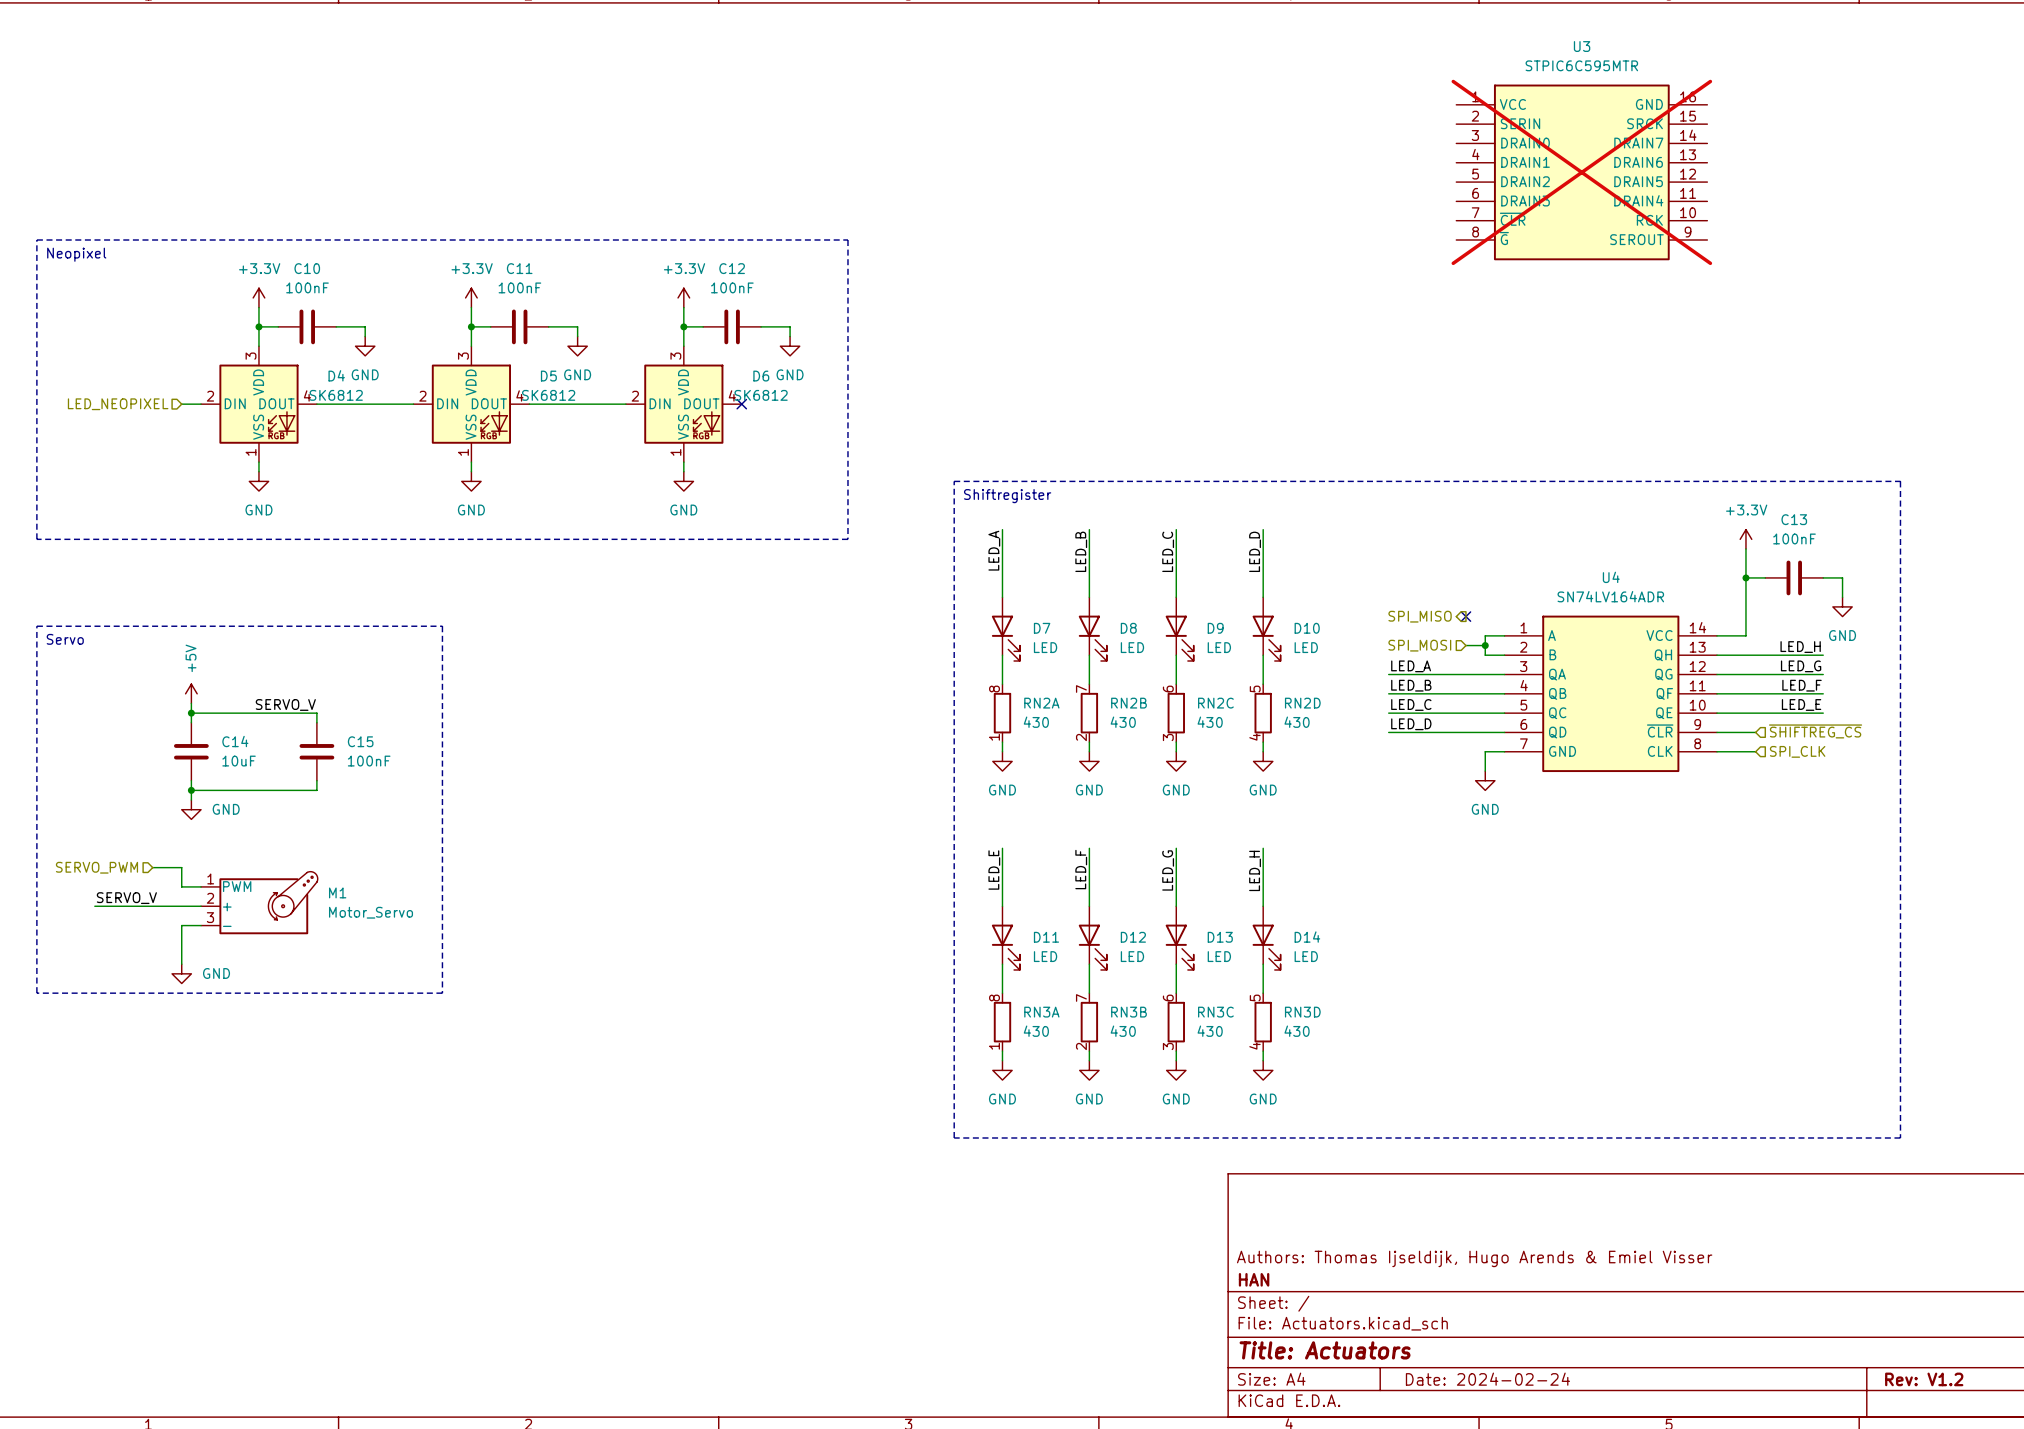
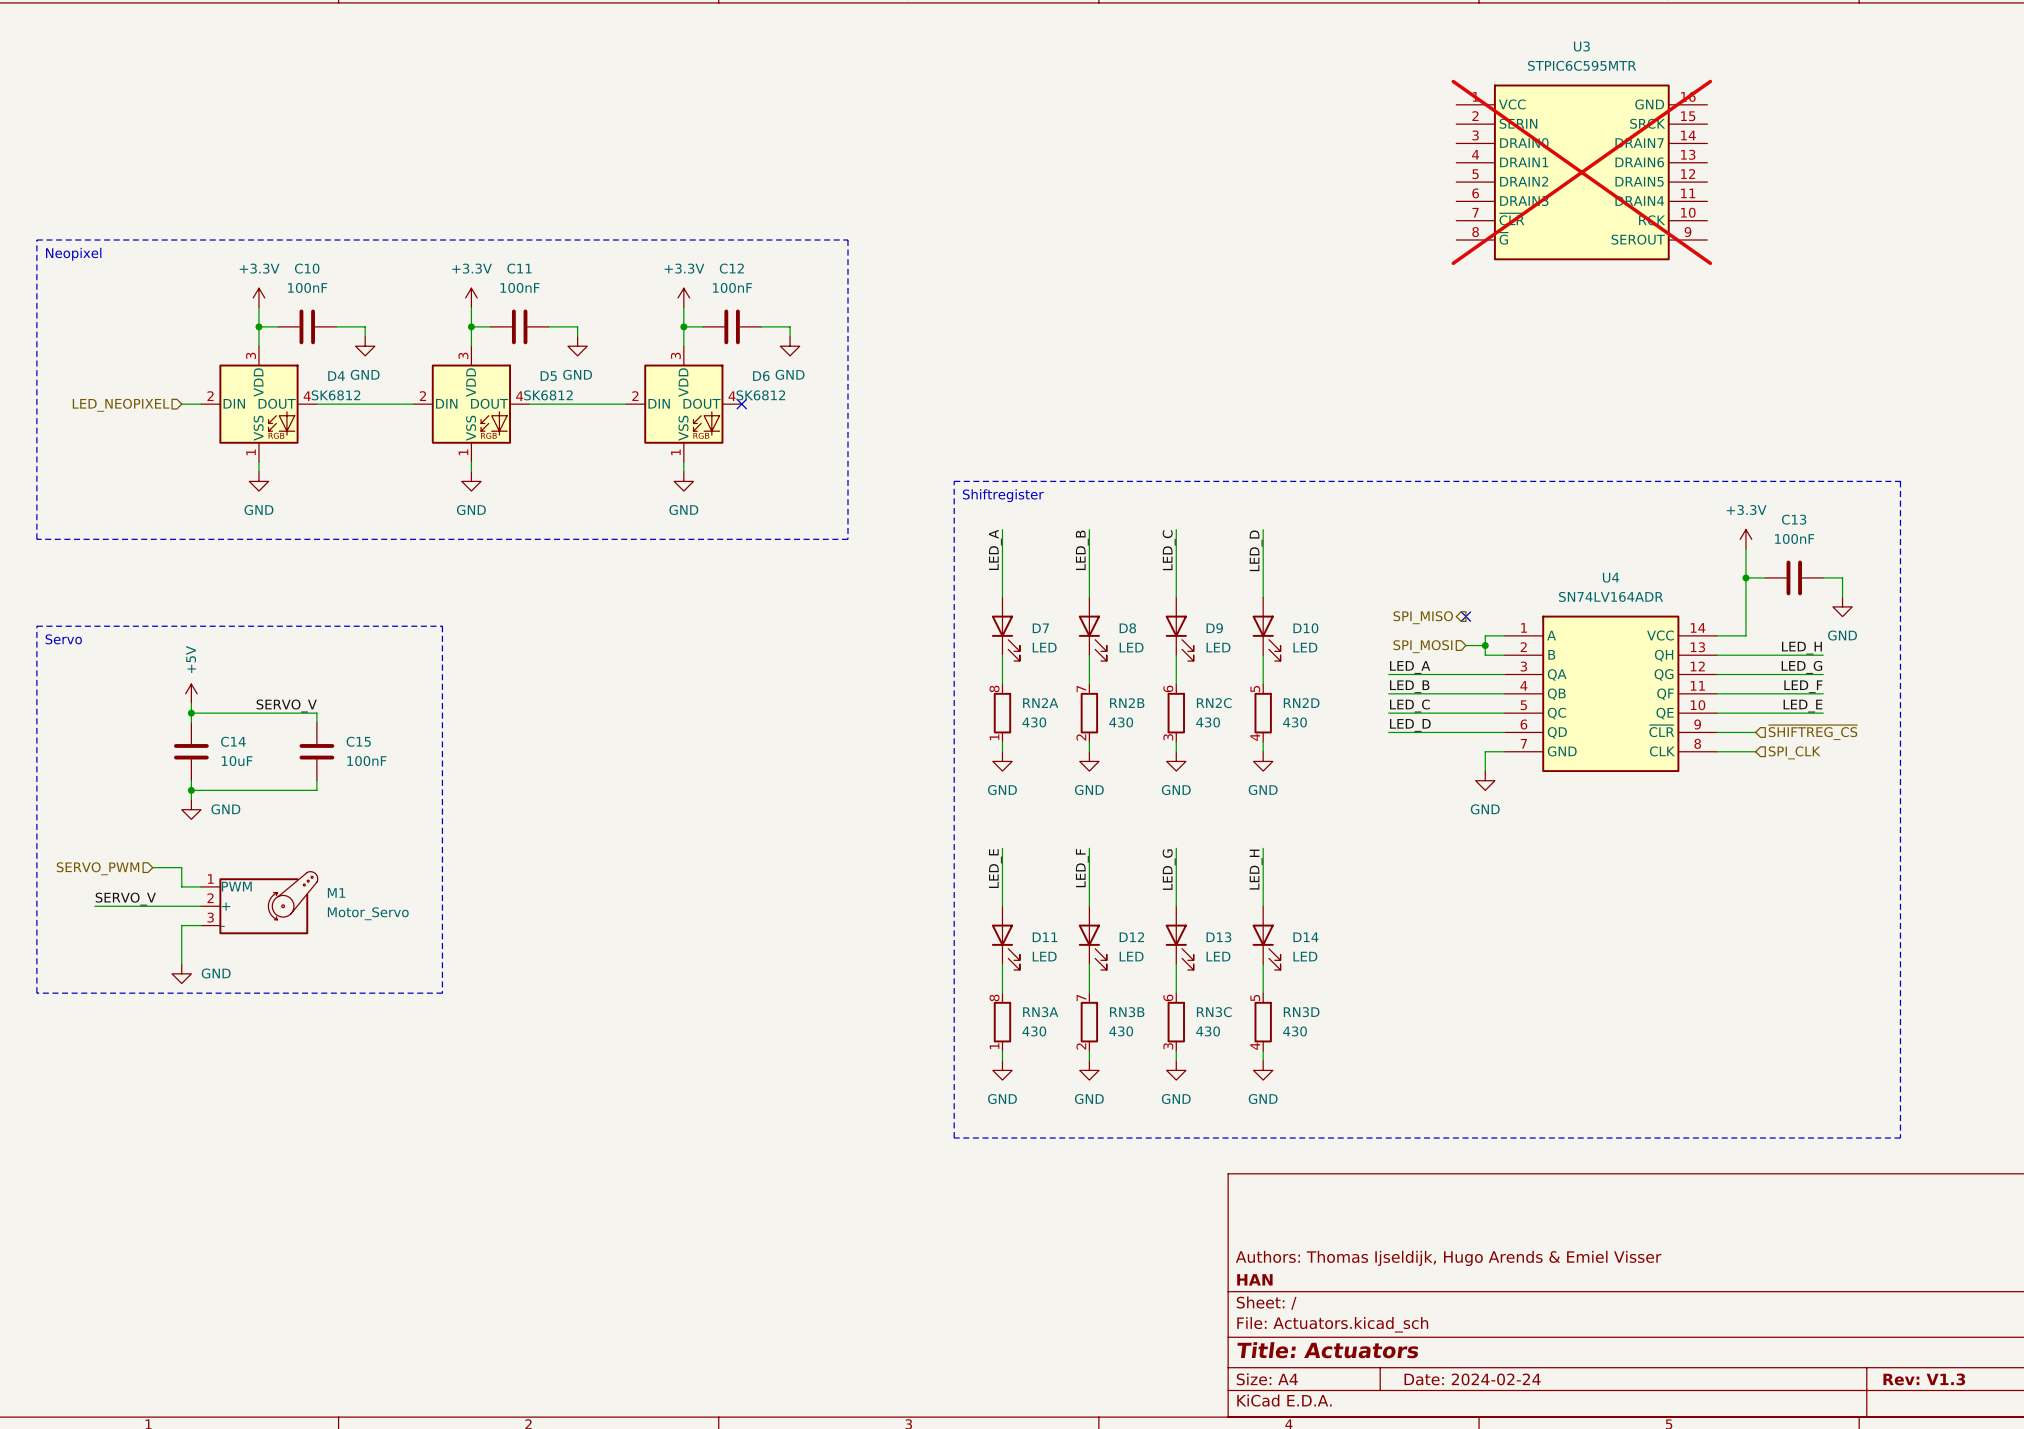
title block: Rev: V1.2 (1924, 1379) -> Rev: V1.3 (1924, 1379)

